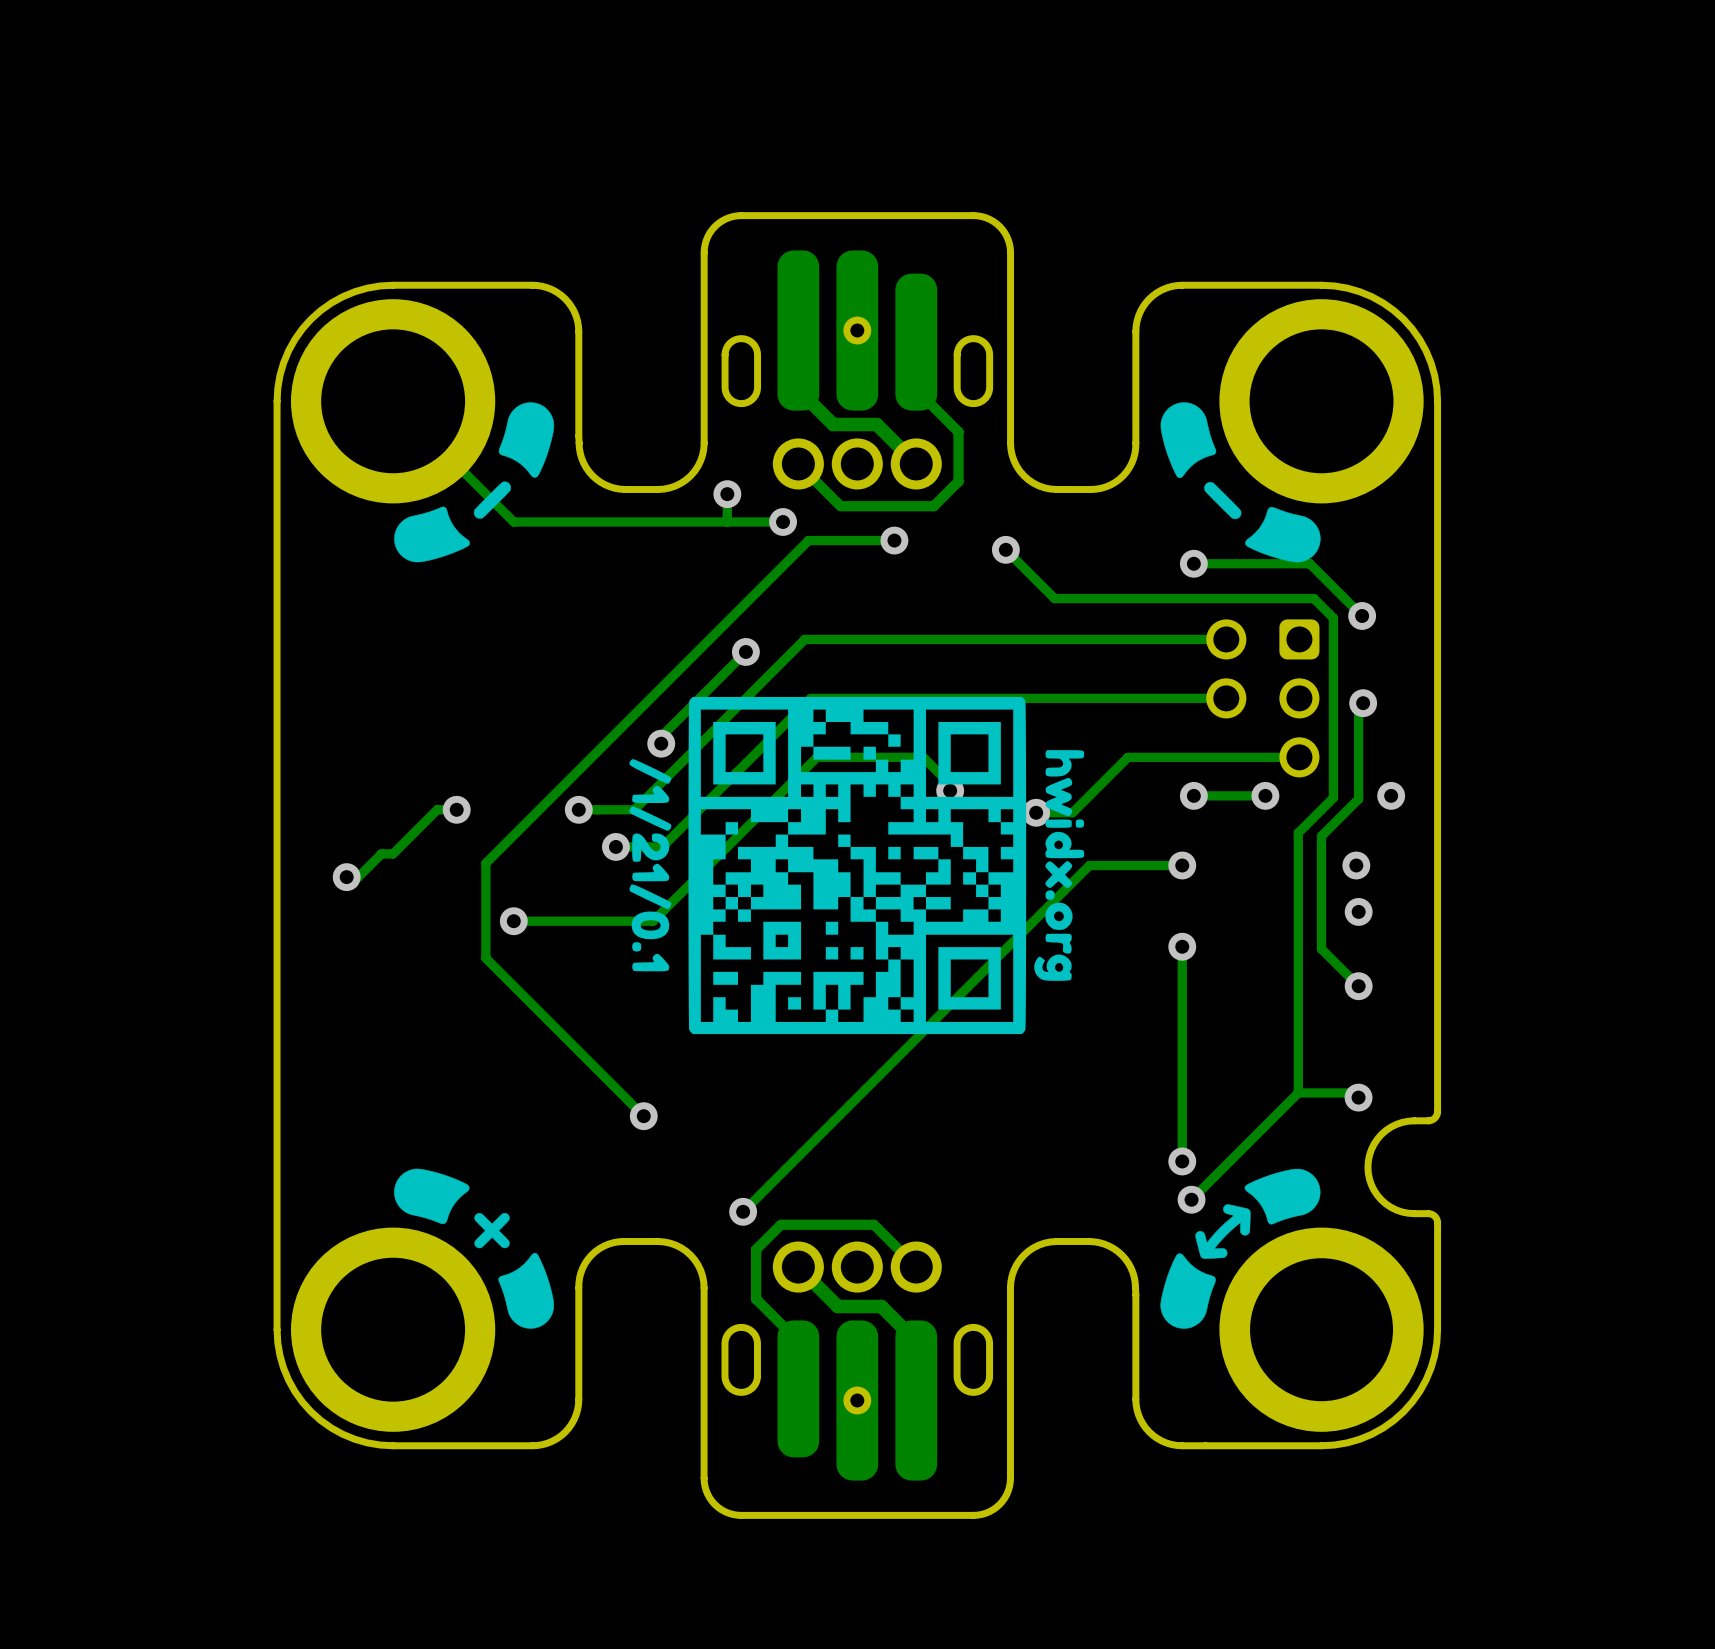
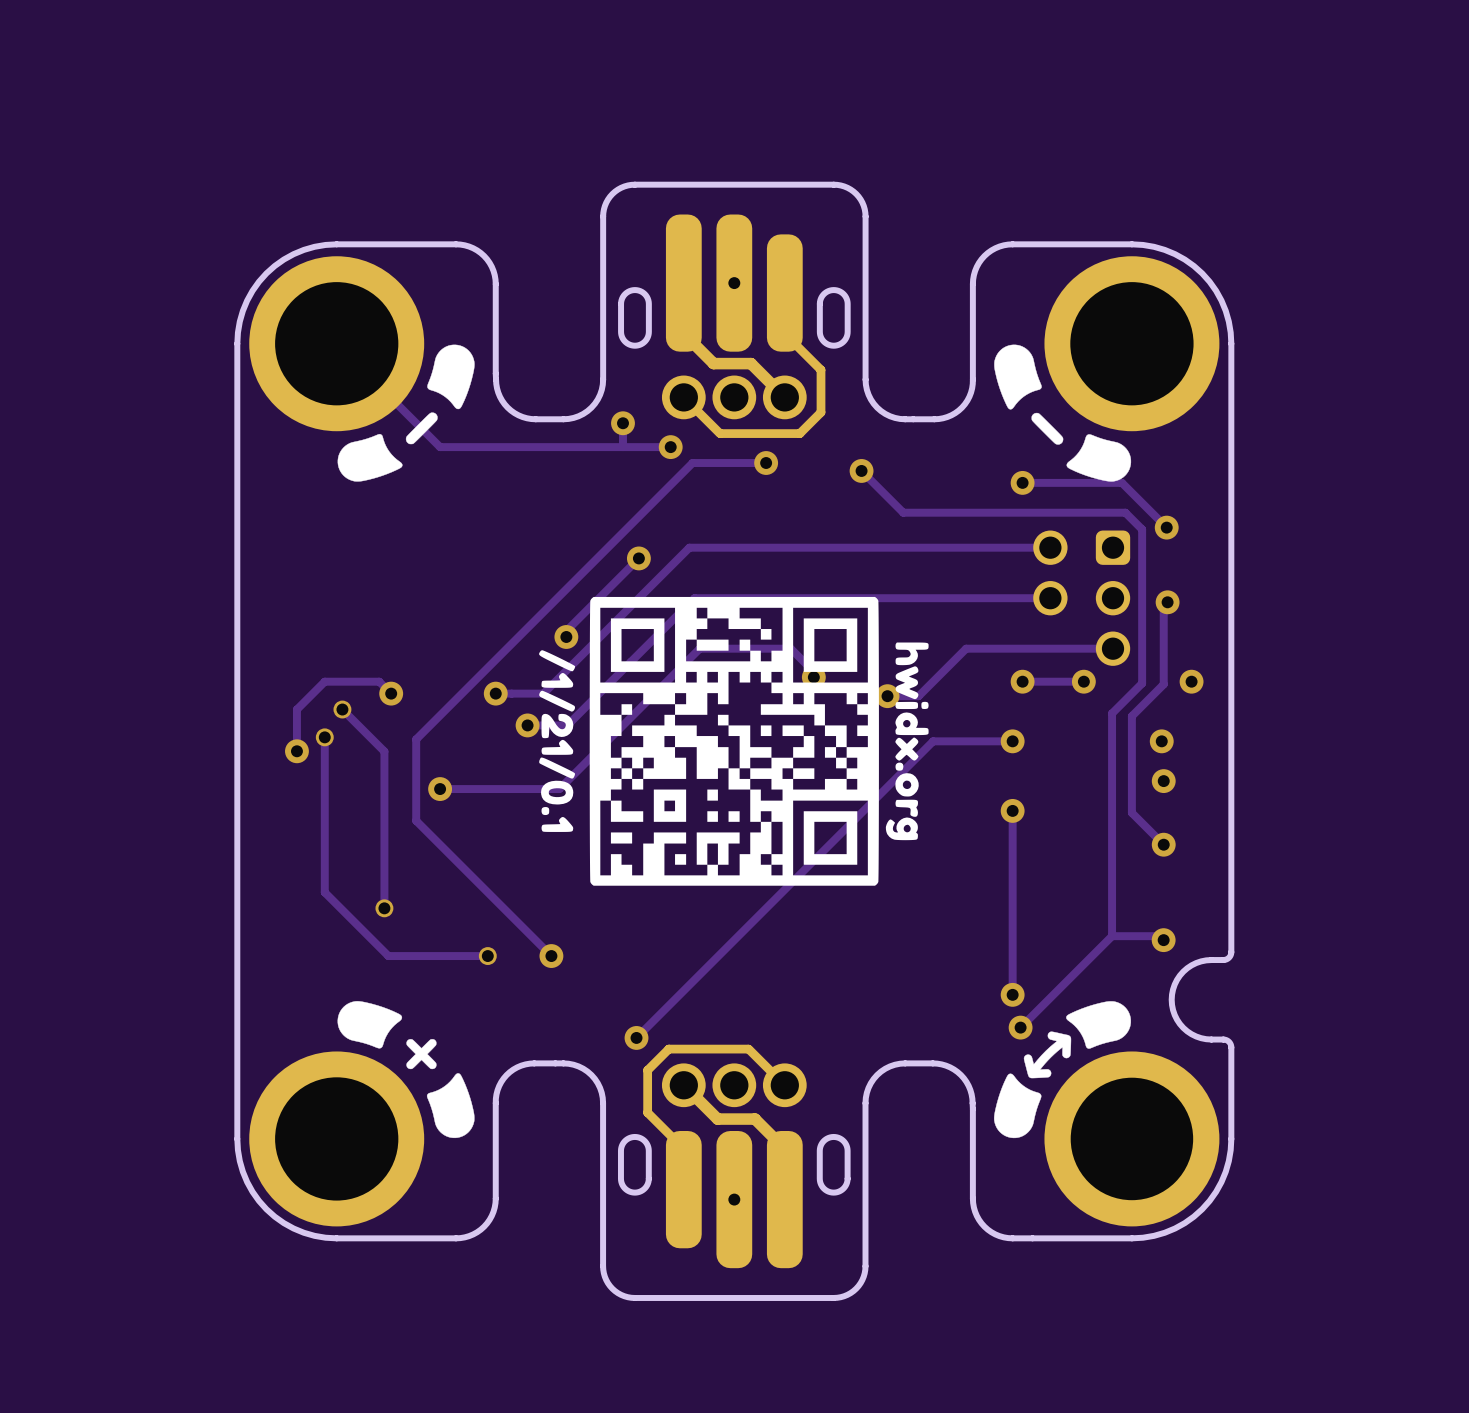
track: (456, 809) (437, 809) (393, 853) (381, 853) (358, 877) (346, 877) -> (391, 693) (379, 681) (324, 681) (296, 709) (296, 751)
track: none -> (342, 709) (384, 751) (384, 908)
via: none -> (342, 709)
track: none -> (324, 737) (324, 892) (388, 956) (487, 956)
via: none -> (324, 737)
via: none -> (384, 908)
via: none -> (487, 956)

